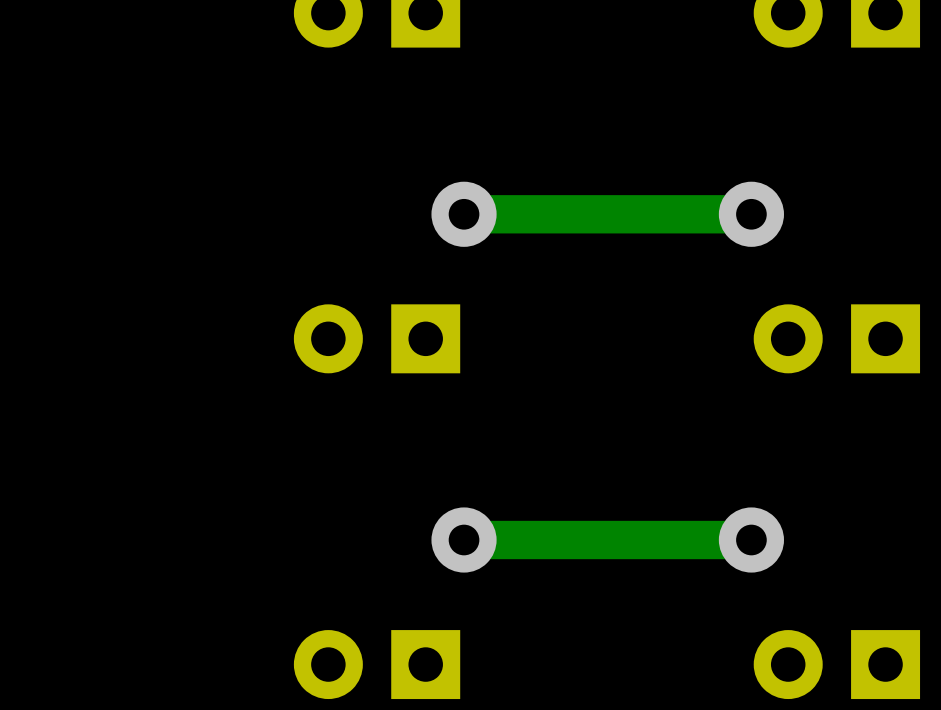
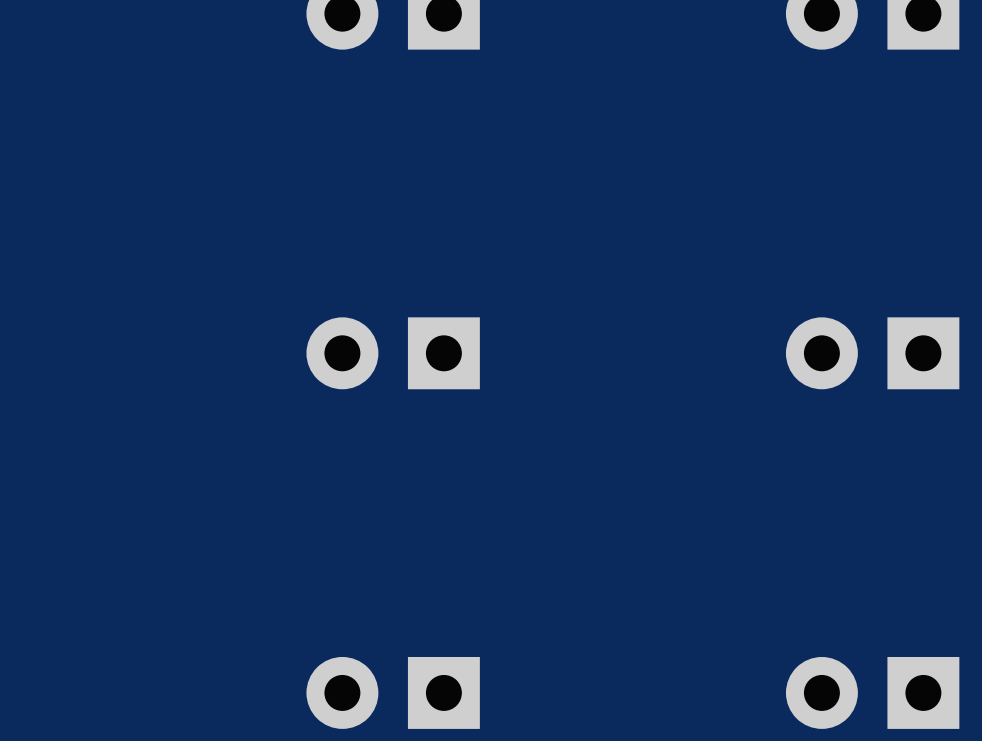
via: (464, 214) -> none
track: (751, 214) (464, 214) -> none
via: (751, 214) -> none
via: (464, 540) -> none
track: (751, 540) (464, 540) -> none
via: (751, 540) -> none

